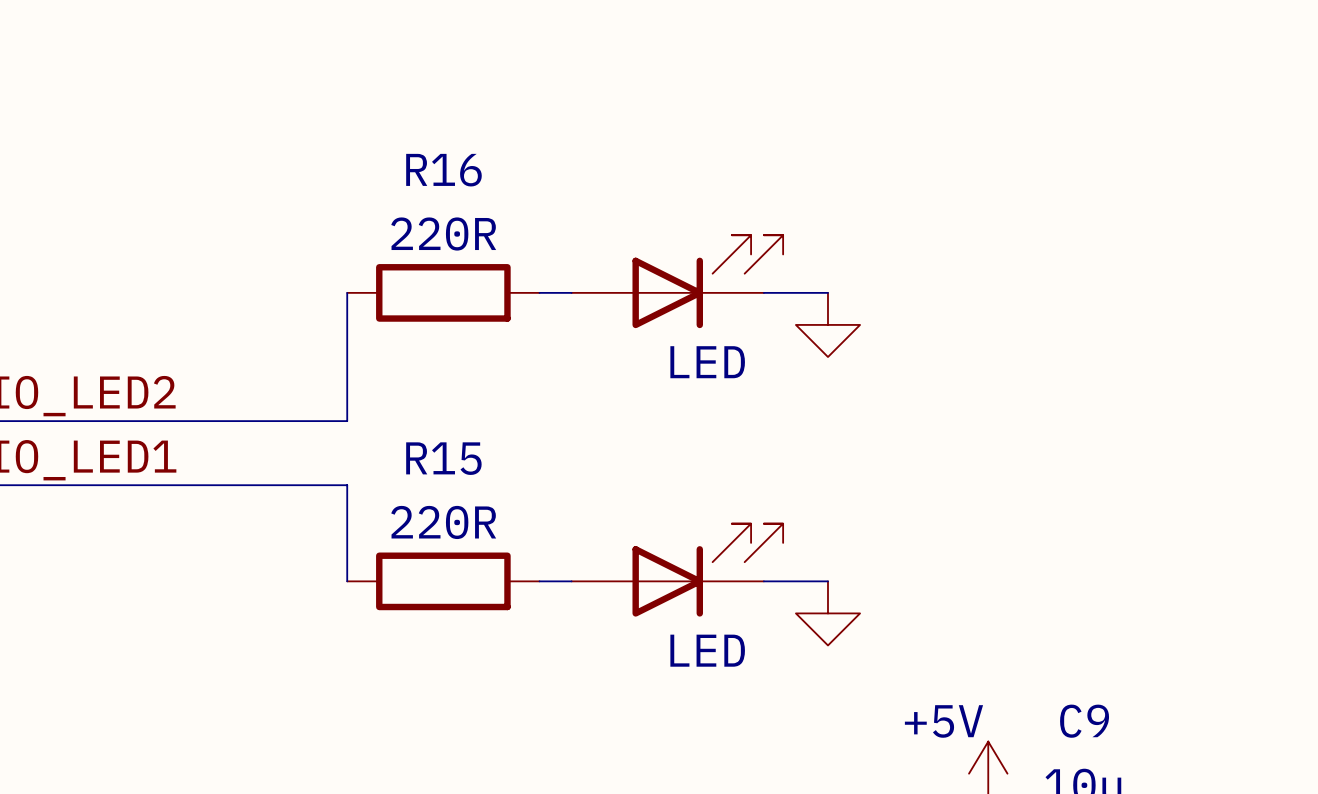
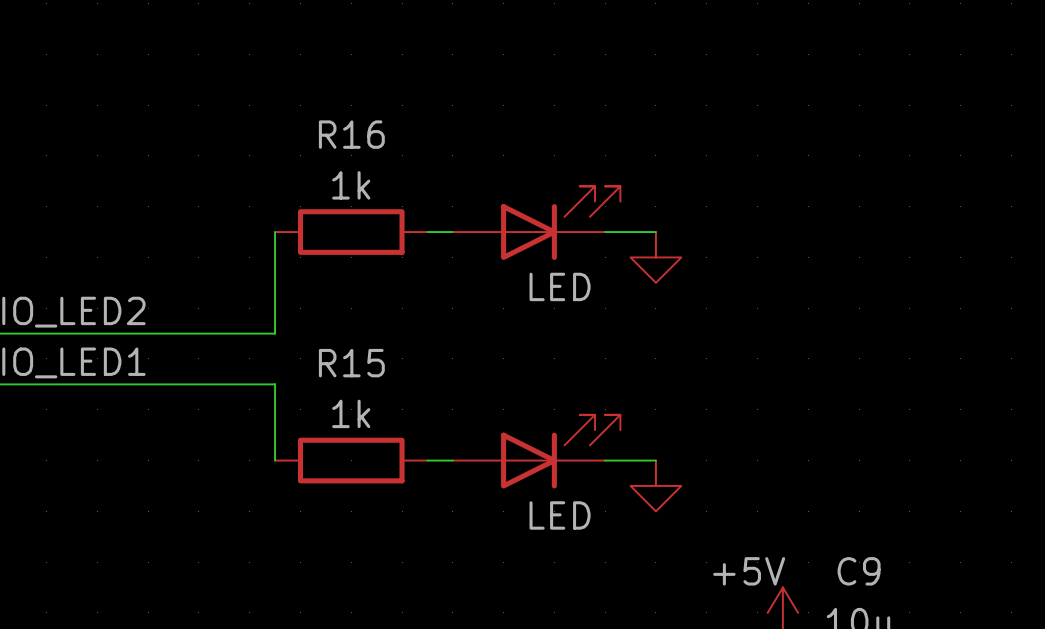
R16 value: 220R (443, 234) -> 1k (351, 185)
R15 value: 220R (443, 522) -> 1k (351, 413)

